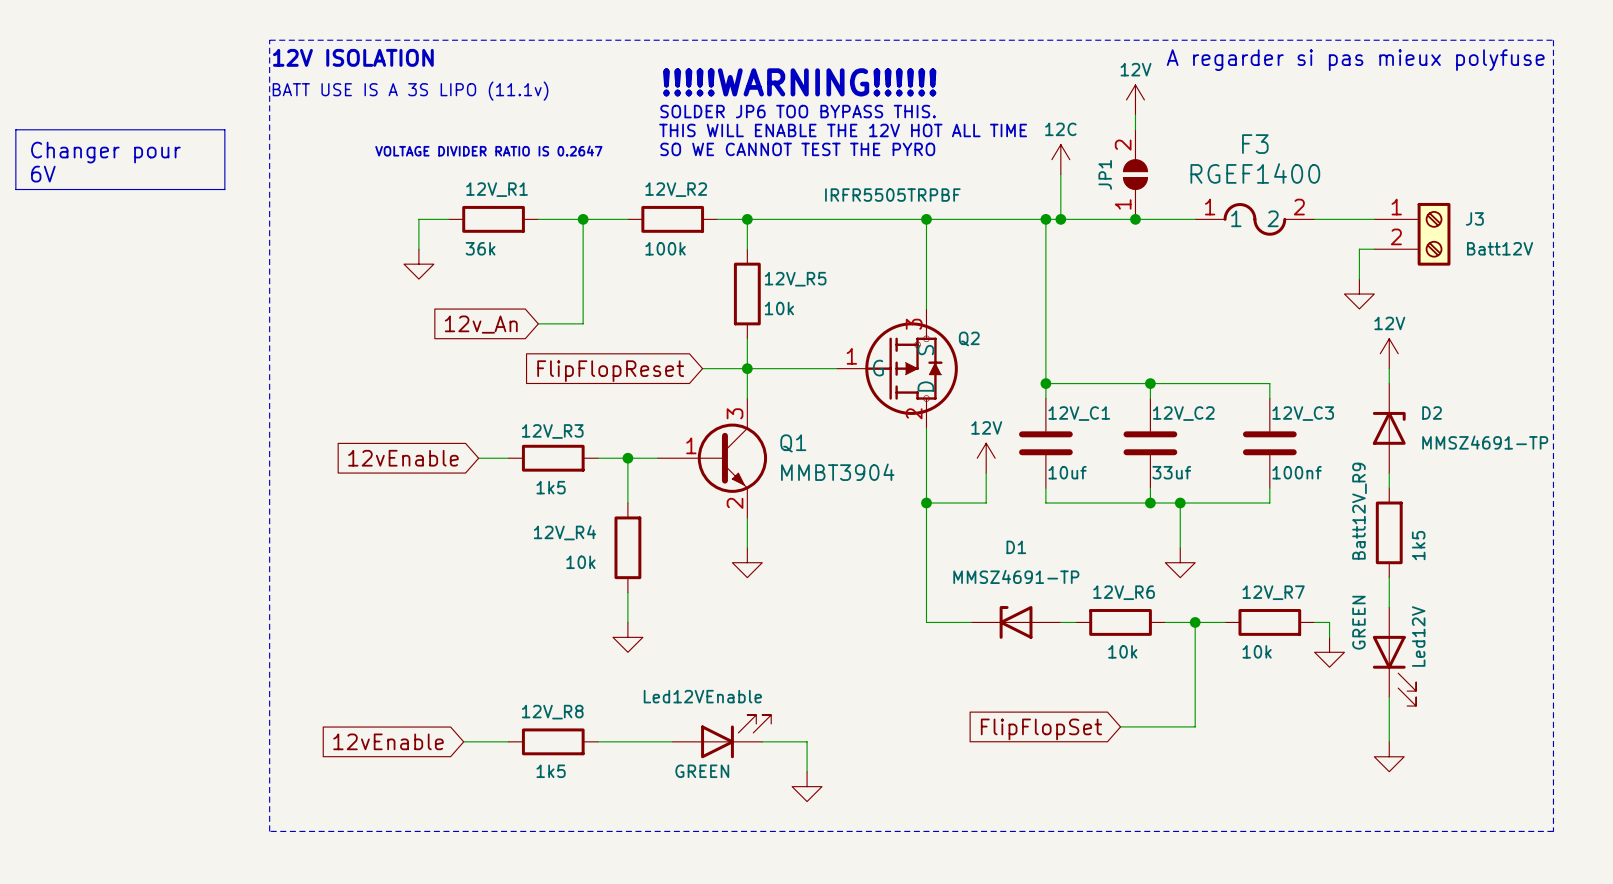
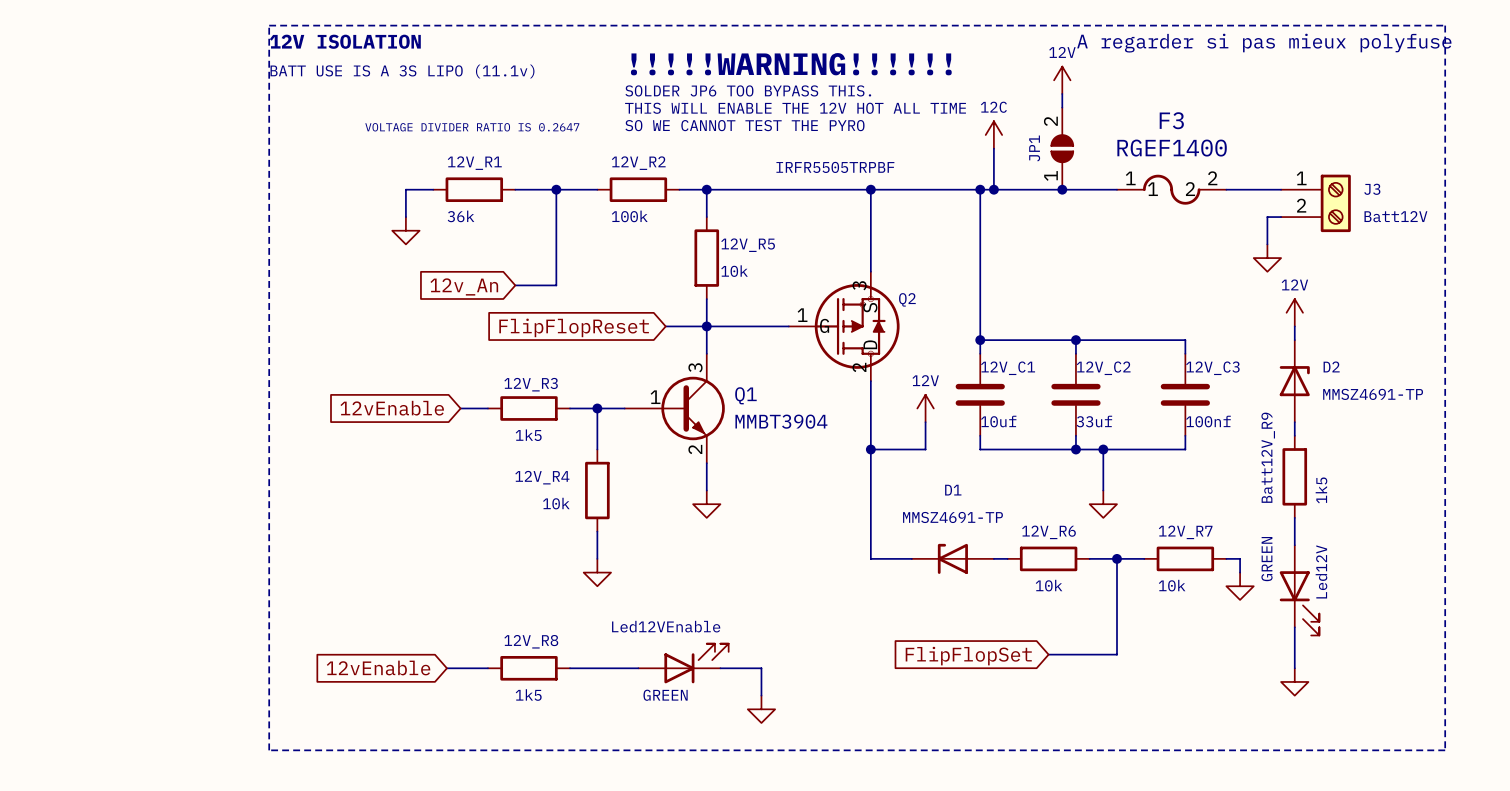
line: (15, 129) (224, 129) (224, 189) (15, 189) (15, 129) -> none
text: Changer pour (105, 152) -> none
text: 6V (43, 174) -> none

